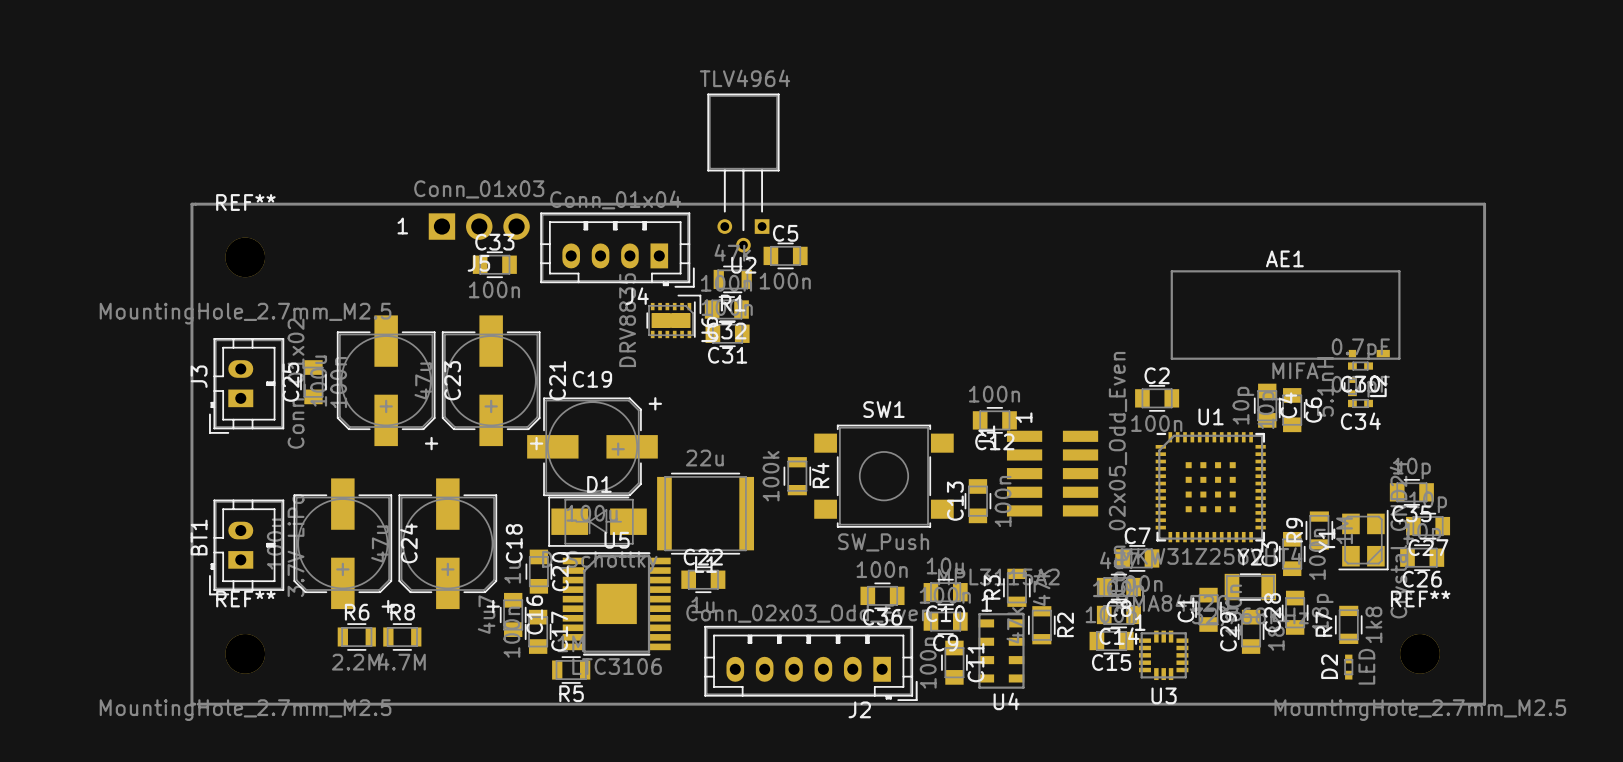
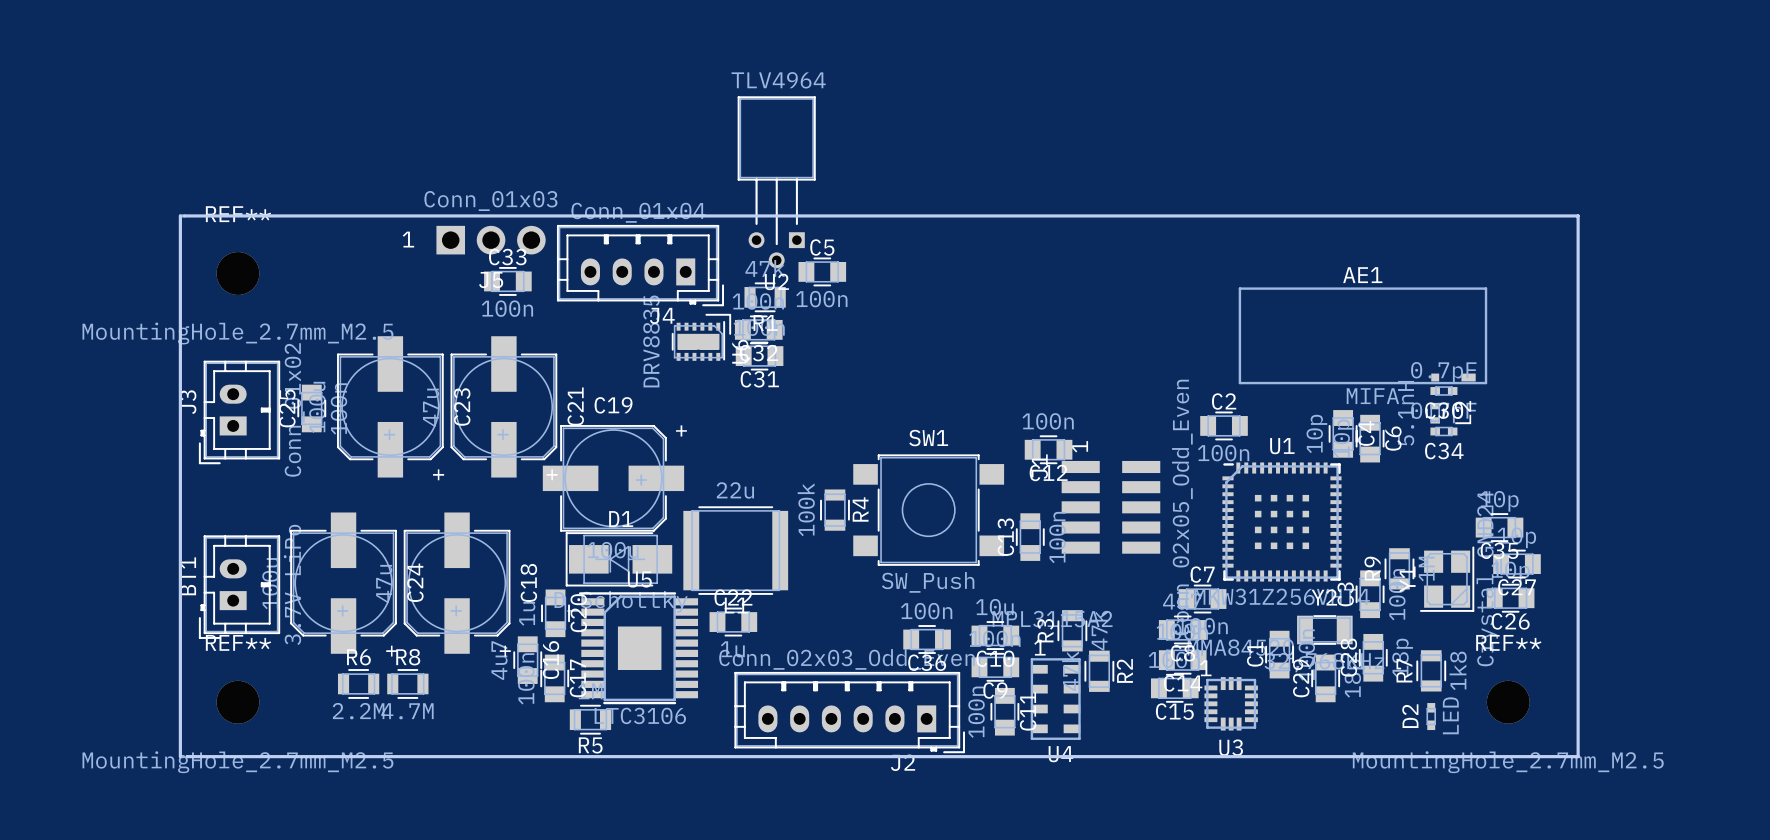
line: (191, 204) (191, 704) -> none
board edge: none -> (180, 215) (180, 756)
line: (195, 204) (1484, 204) (1484, 704) (198, 704) -> none
board edge: none -> (184, 215) (1578, 215) (1578, 756) (187, 756)

